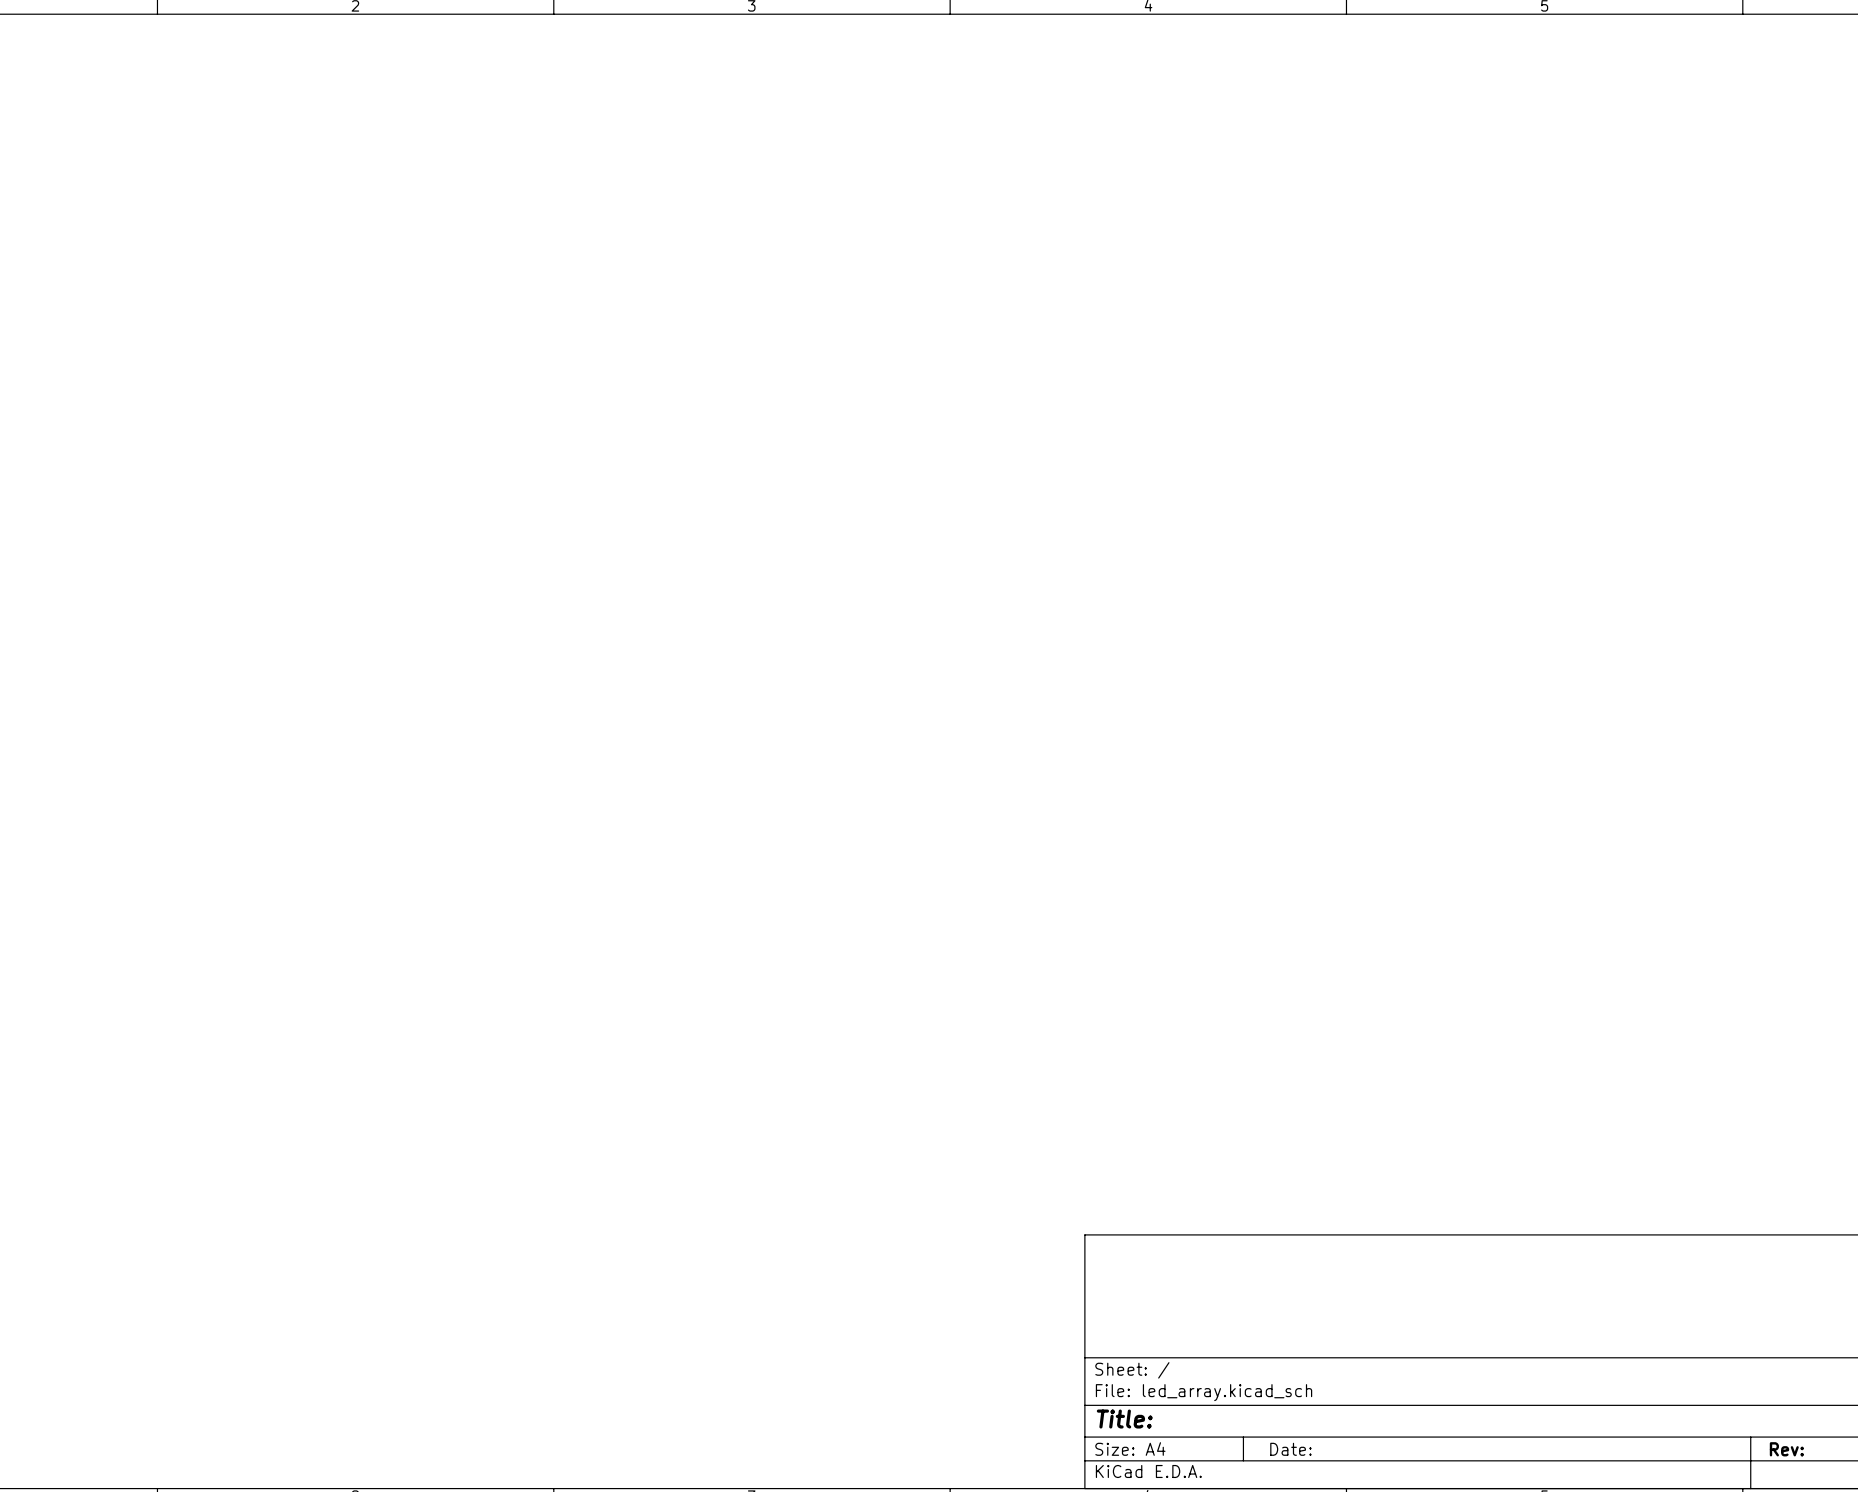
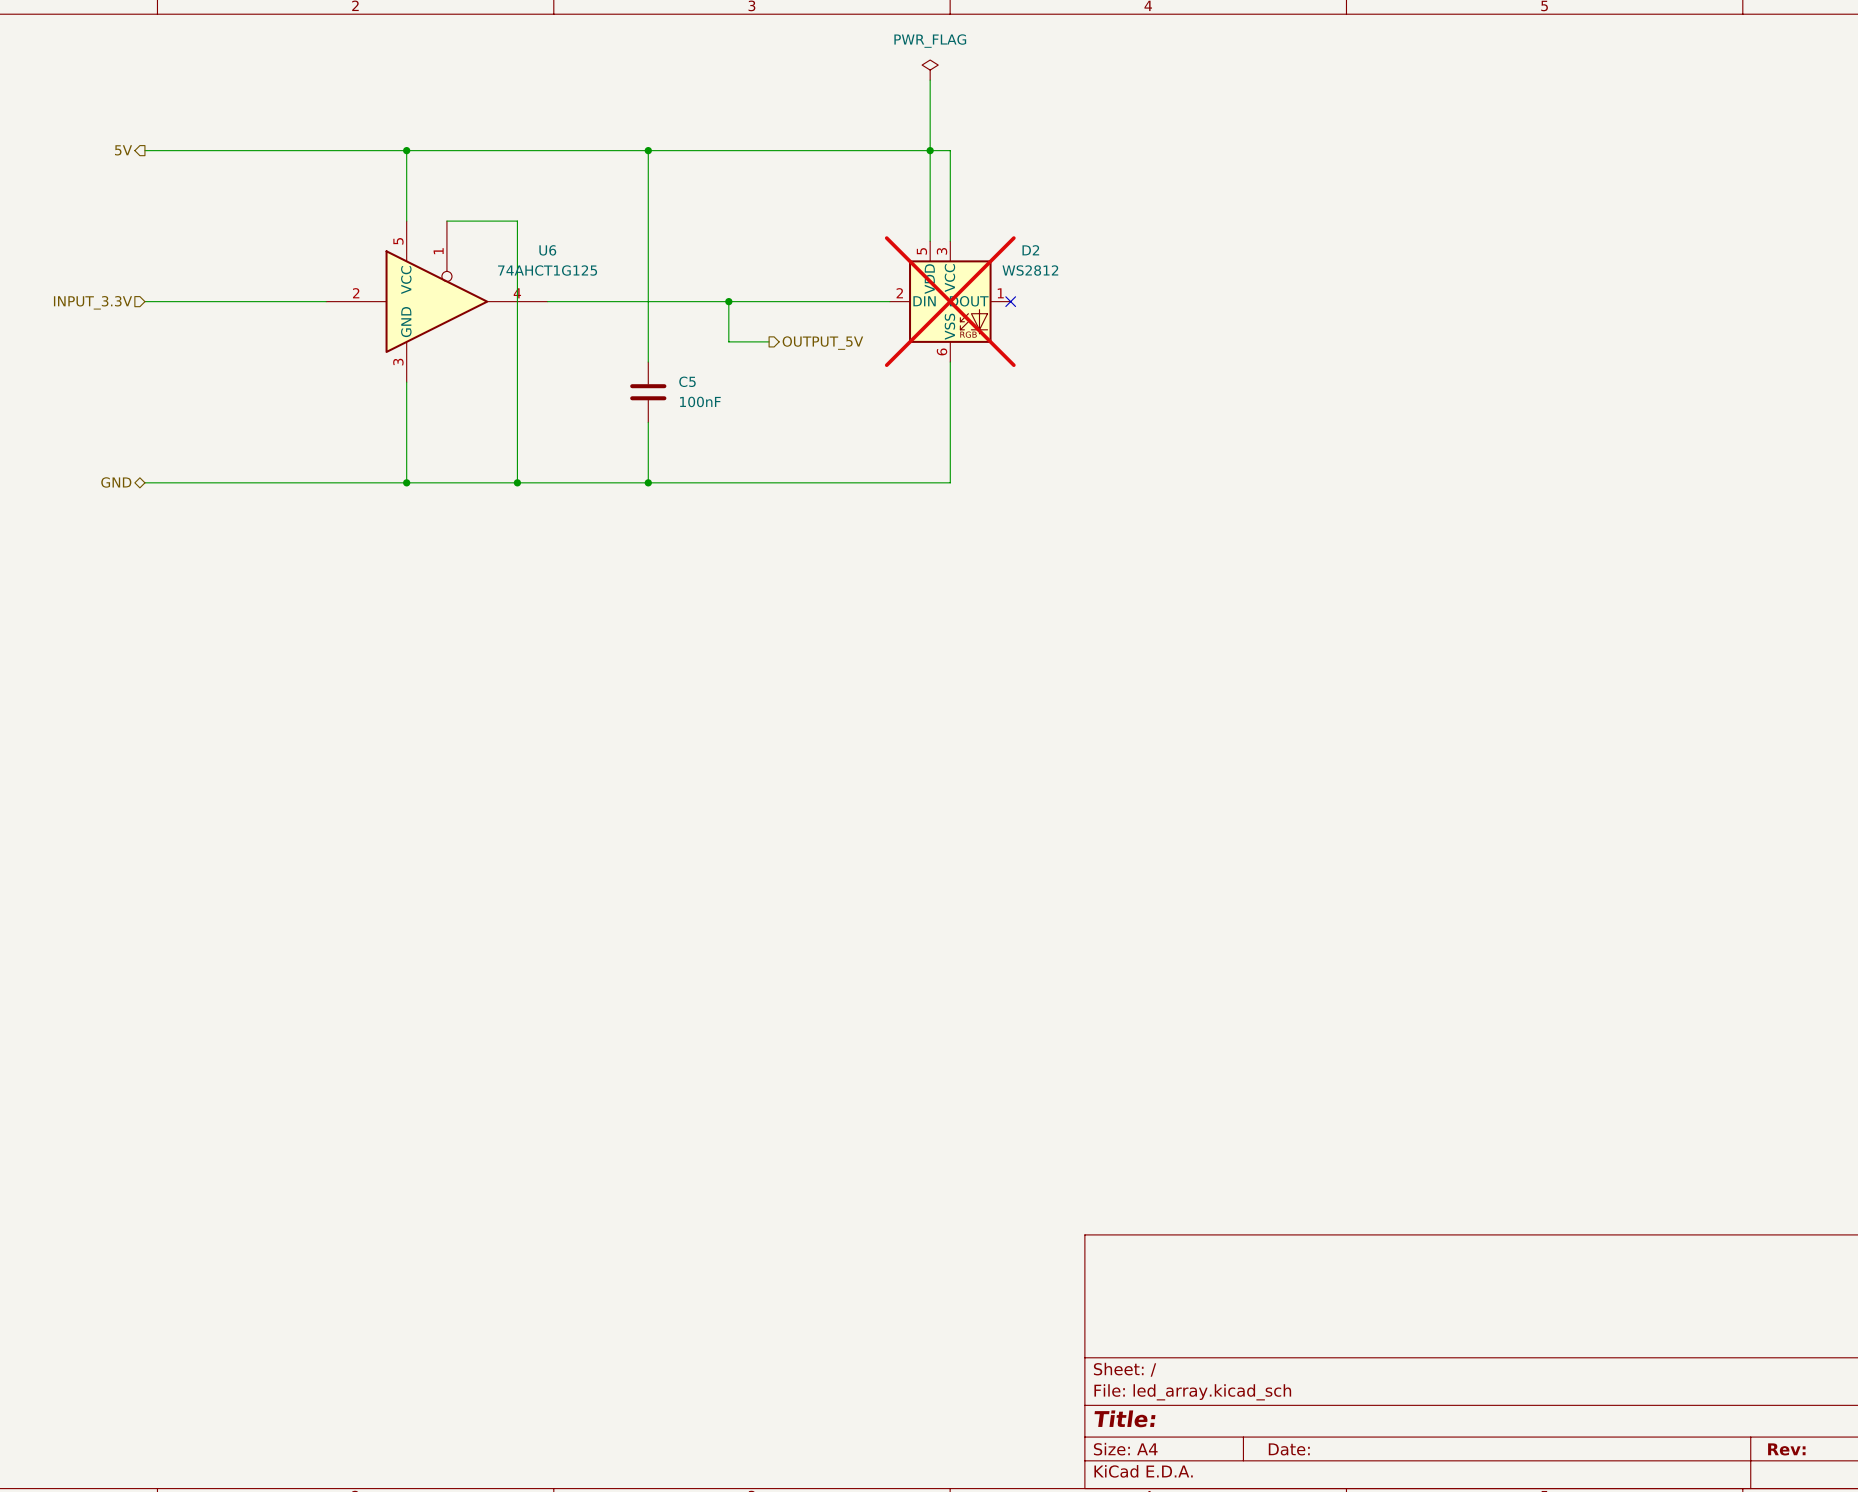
power symbol: none -> PWR_FLAG (930, 70)
wire: none -> (930, 80) (930, 241)
hierarchical label: none -> 5V (123, 150)
wire: none -> (144, 150) (950, 150) (950, 241)
wire: none -> (406, 150) (406, 221)
junction: none -> (406, 150)
wire: none -> (648, 150) (648, 362)
junction: none -> (648, 150)
junction: none -> (930, 150)
wire: none -> (446, 221) (517, 221) (517, 482)
hierarchical label: none -> INPUT_3.3V (92, 302)
wire: none -> (144, 301) (326, 301)
U6: none -> 74AHCT1G125 (436, 301)
wire: none -> (547, 301) (889, 301)
wire: none -> (728, 301) (728, 341) (769, 341)
junction: none -> (728, 301)
D2: none -> WS2812 (950, 301)
no-connect mark: none -> (1010, 301)
hierarchical label: none -> OUTPUT_5V (822, 343)
wire: none -> (950, 362) (950, 482) (144, 482)
wire: none -> (406, 382) (406, 482)
C5: none -> 100nF (648, 392)
wire: none -> (648, 422) (648, 482)
hierarchical label: none -> GND (116, 482)
junction: none -> (406, 482)
junction: none -> (517, 482)
junction: none -> (648, 482)

